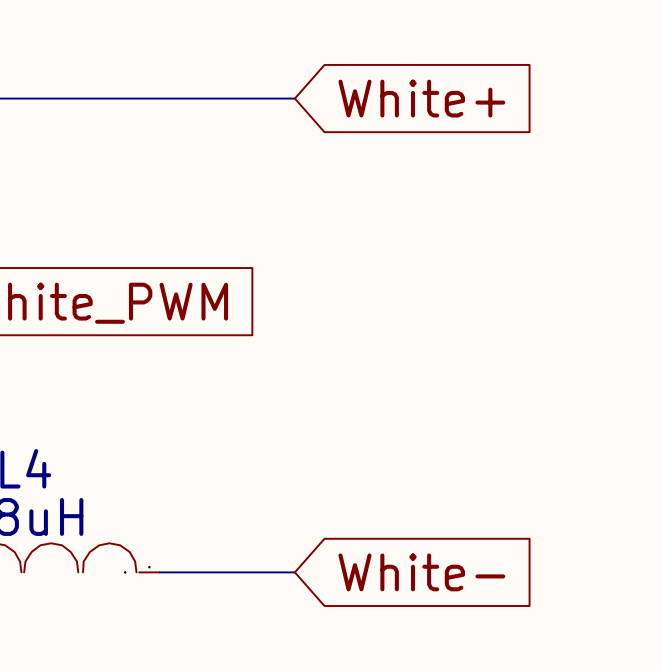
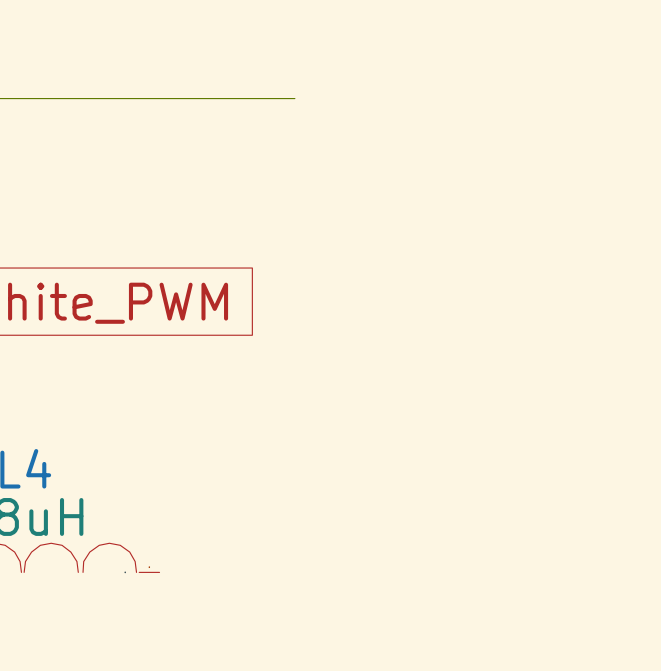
global label: White+ (421, 98) -> none
wire: (159, 572) (294, 572) -> none
global label: White- (421, 572) -> none

